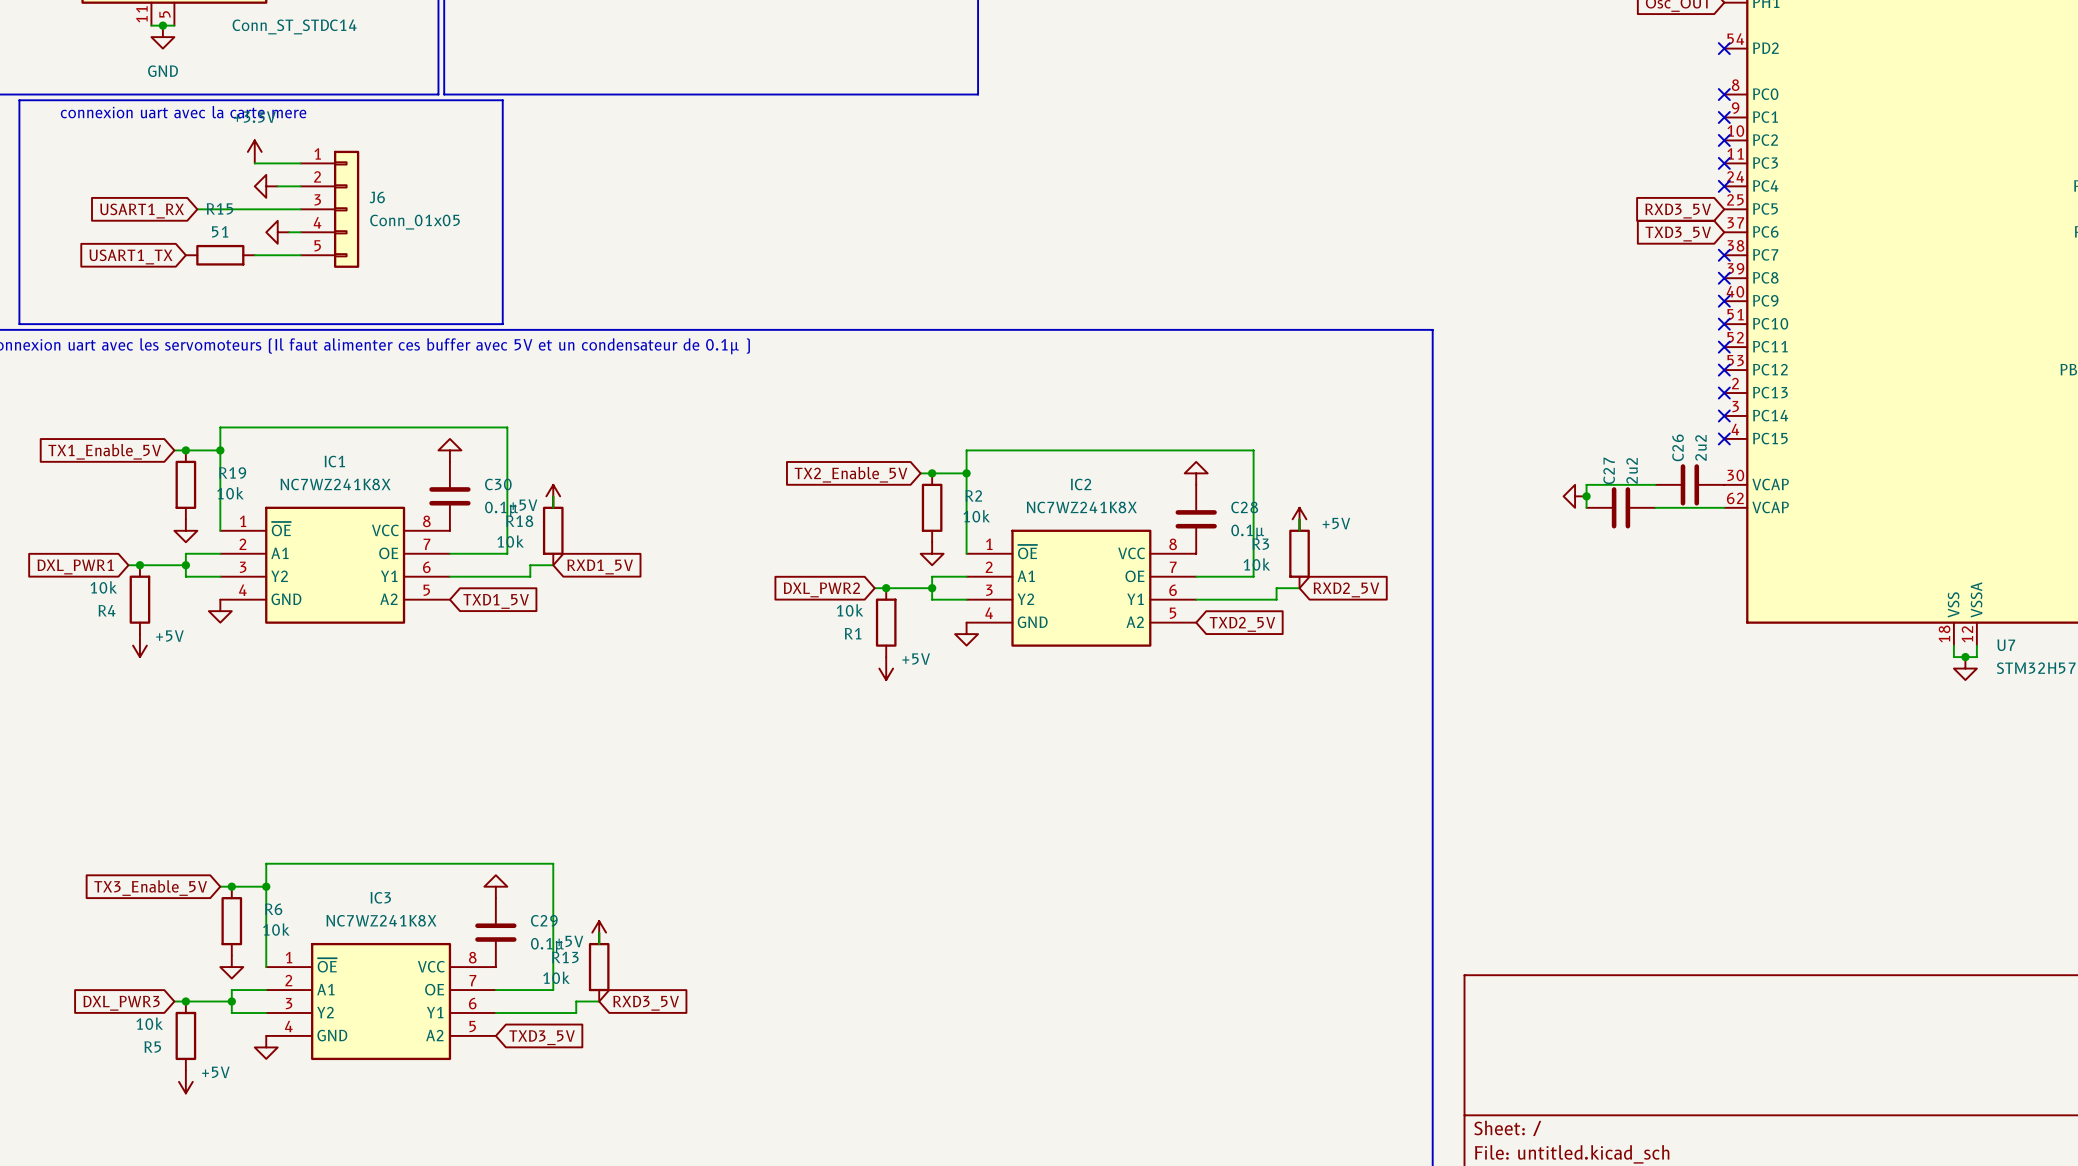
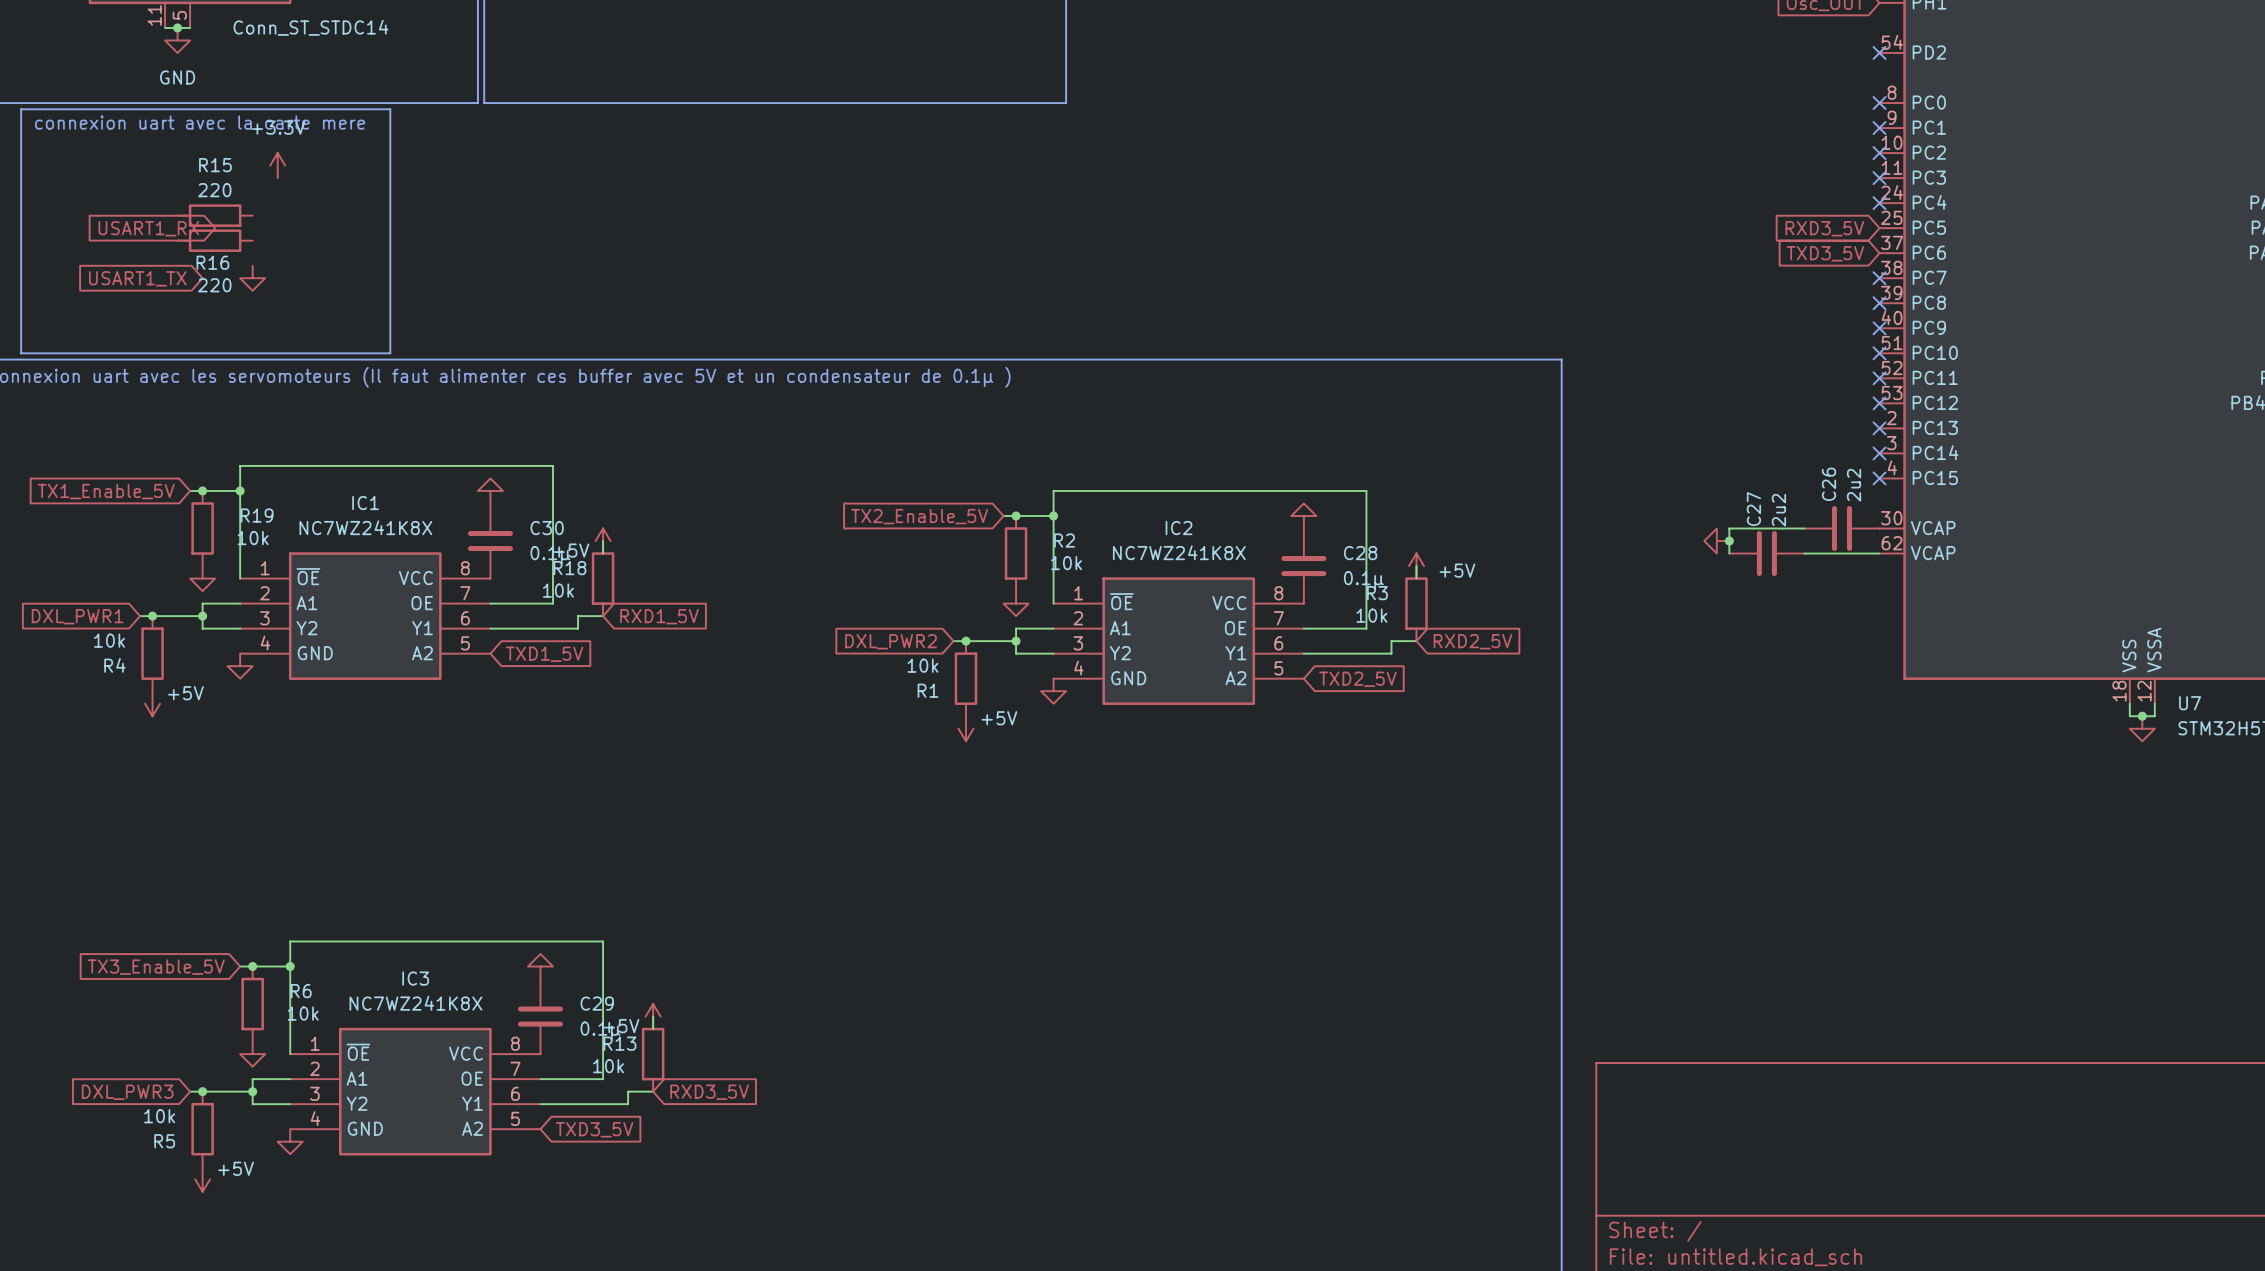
line: (358, 100) (502, 100) (502, 324) (358, 324) -> (390, 109) (390, 353)
wire: (254, 163) (300, 163) -> none
power symbol: (266, 186) -> none
wire: (277, 186) (300, 186) -> none
wire: (197, 209) (300, 209) -> none
J6: Conn_01x05 (329, 209) -> none
R16: none -> 220 (215, 240)
R15 value: 51 (220, 231) -> 220 (214, 190)
power symbol: (277, 232) -> none
wire: (289, 232) (300, 232) -> none
R15 position: (220, 255) -> (215, 215)
power symbol: none -> (252, 278)
wire: (254, 255) (300, 255) -> none

